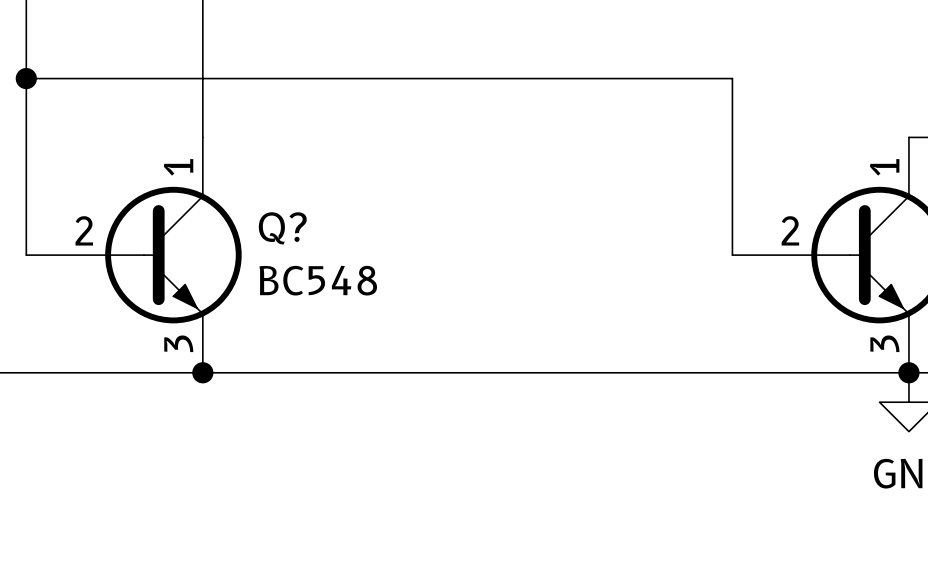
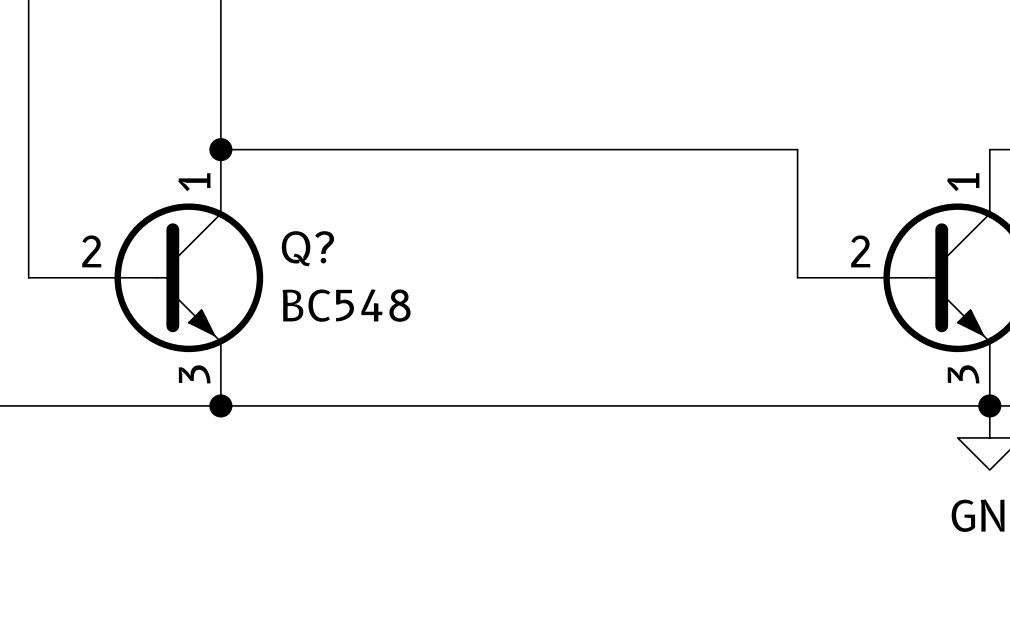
wire: (26, 78) (732, 78) (732, 137) -> (220, 149) (797, 149)
junction: (26, 78) -> none
junction: none -> (220, 149)

